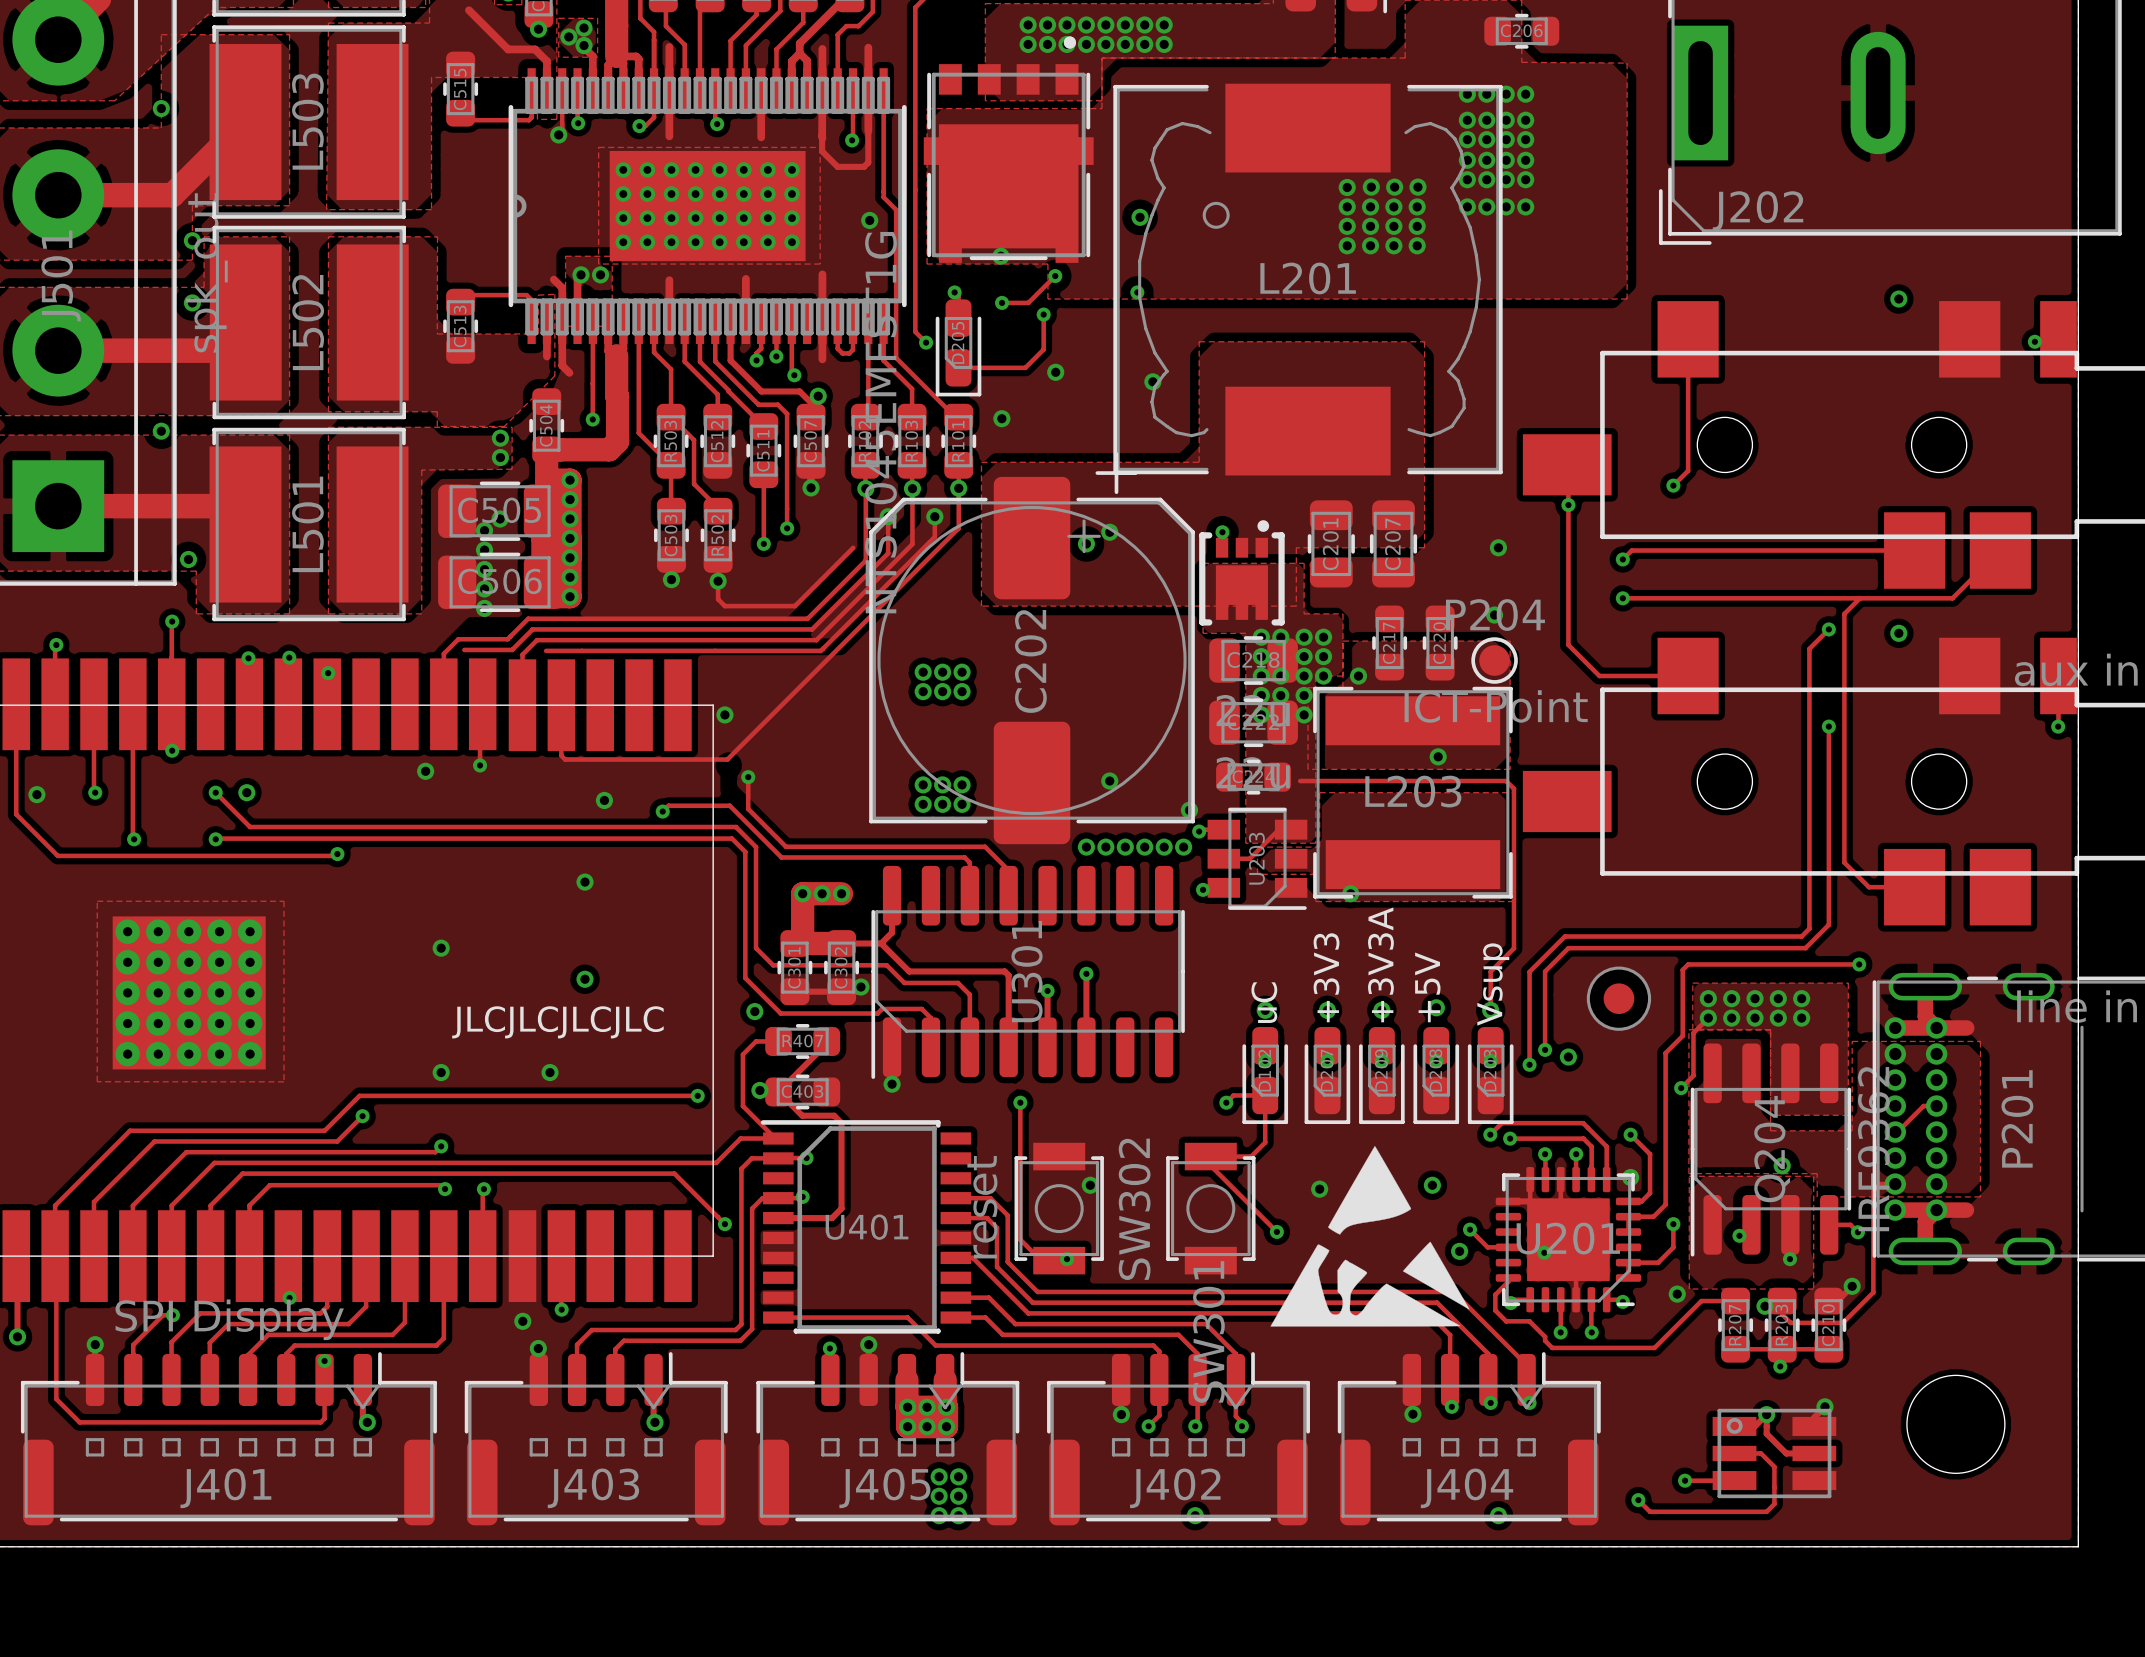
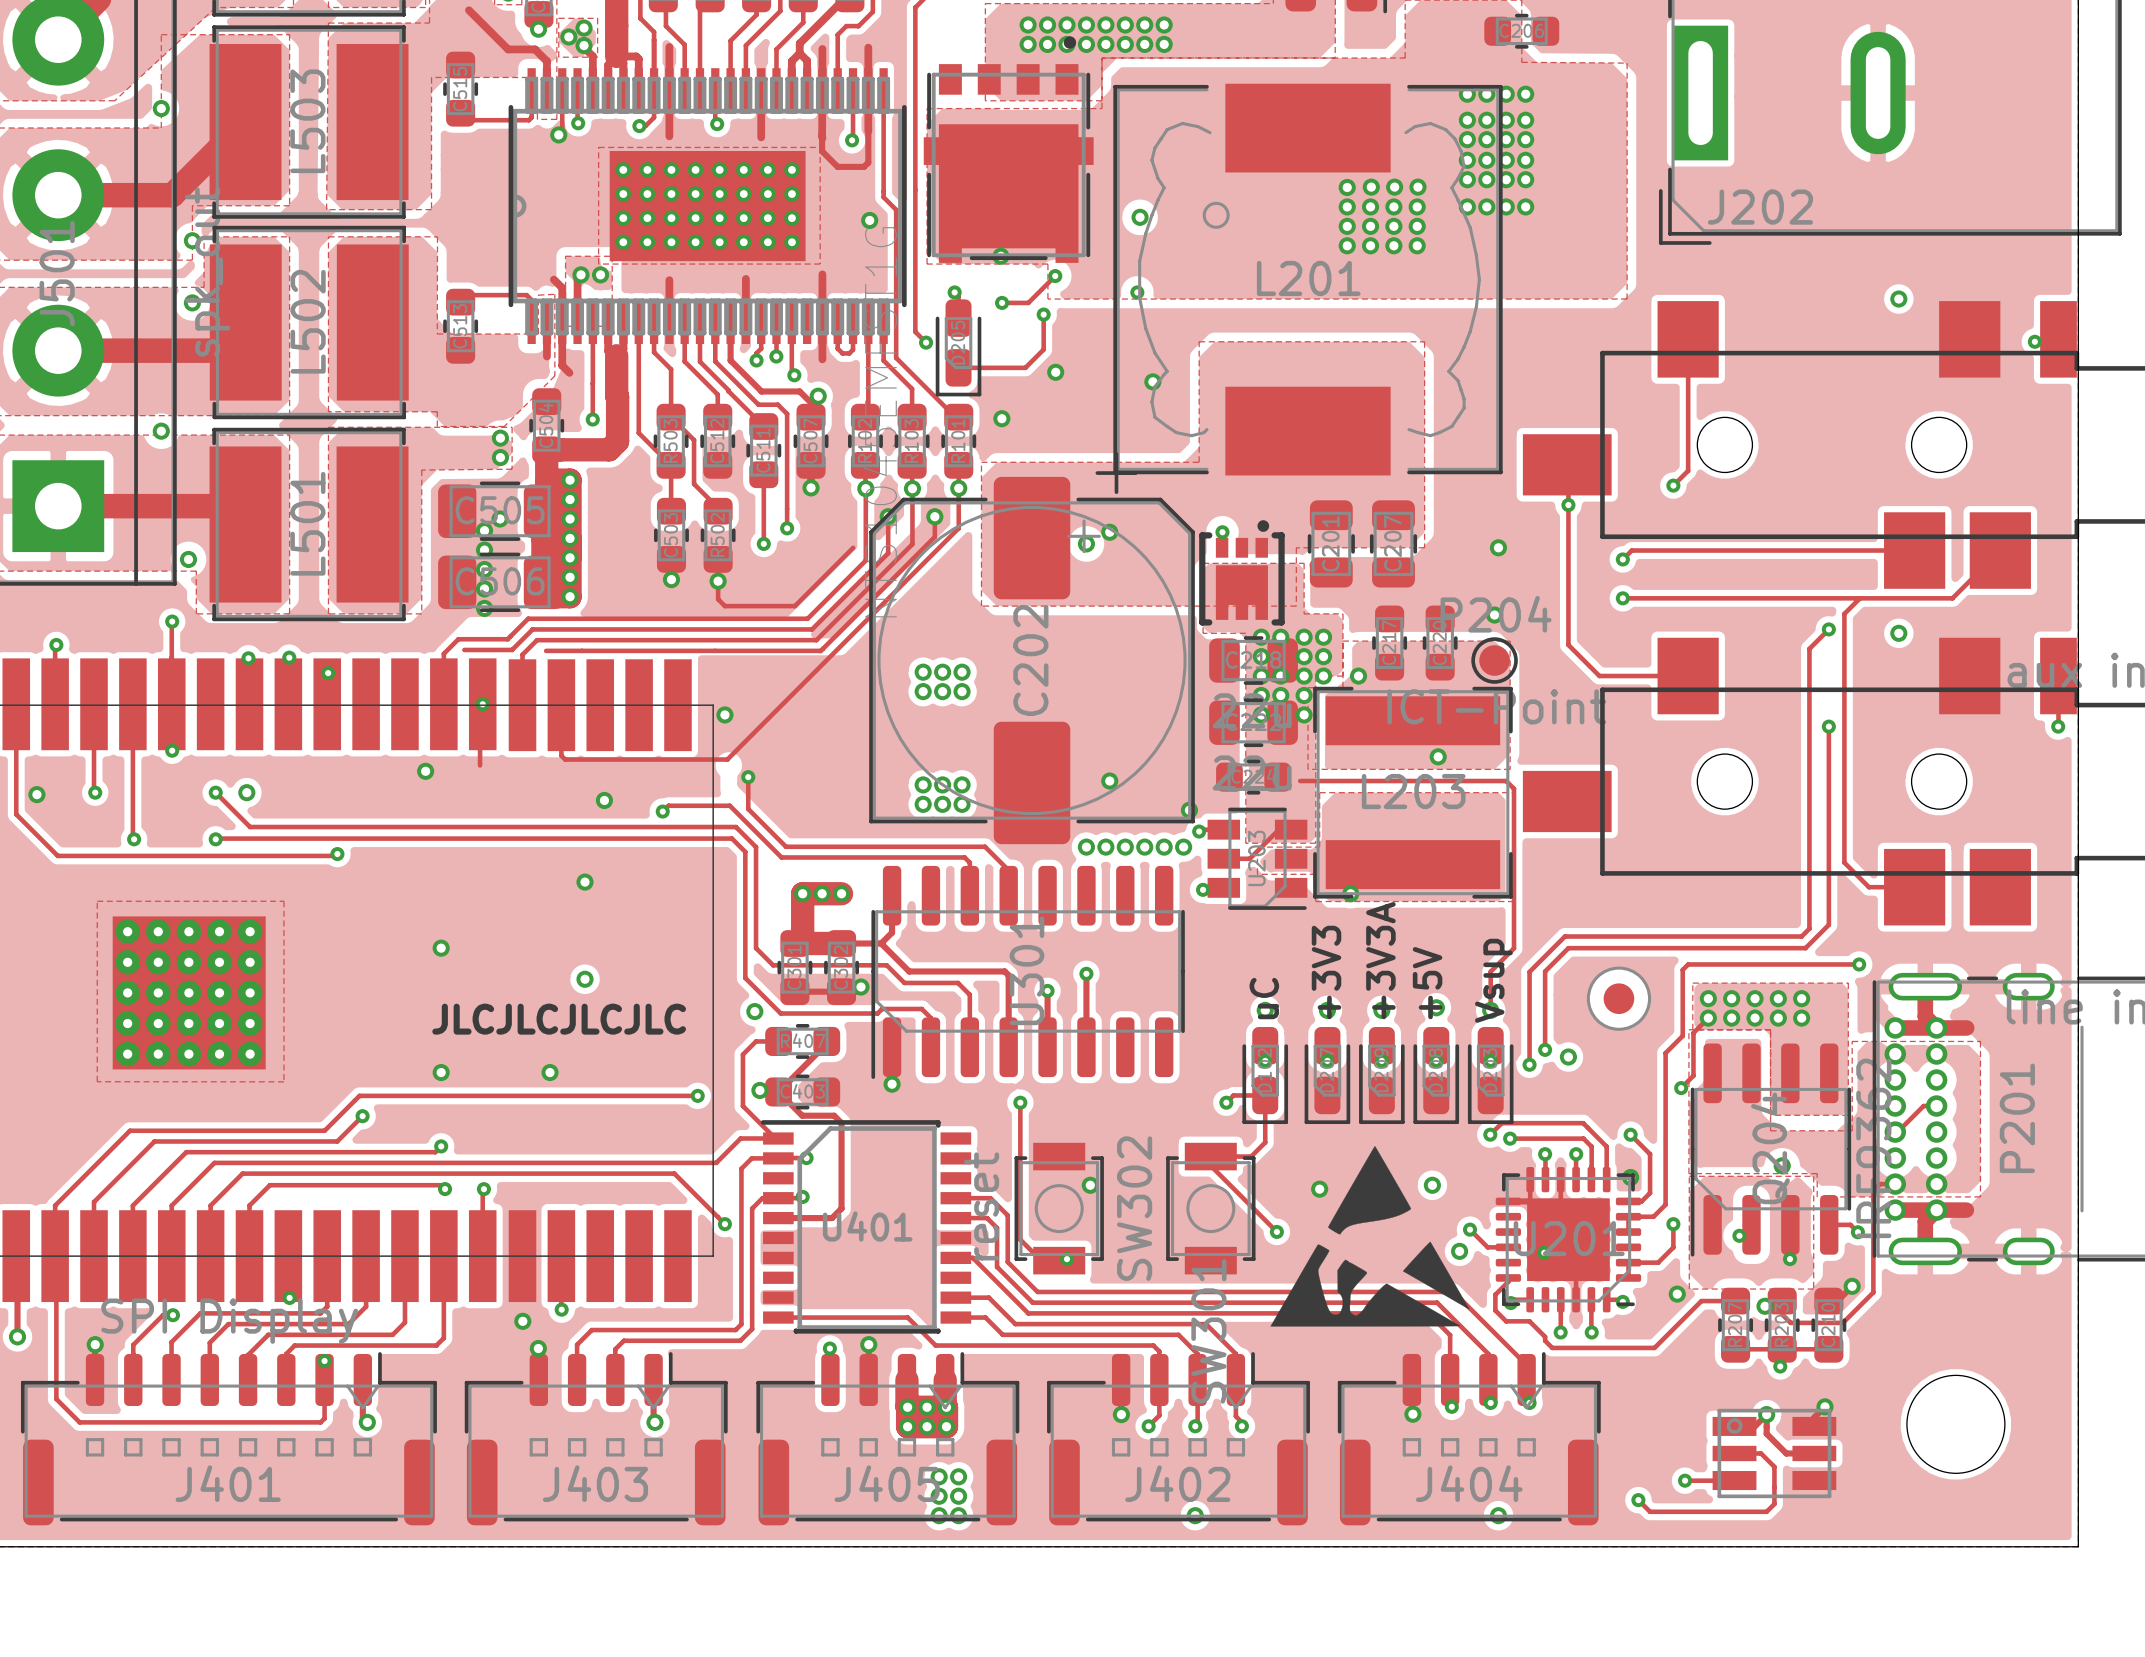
via position: (480, 765) -> (482, 704)

